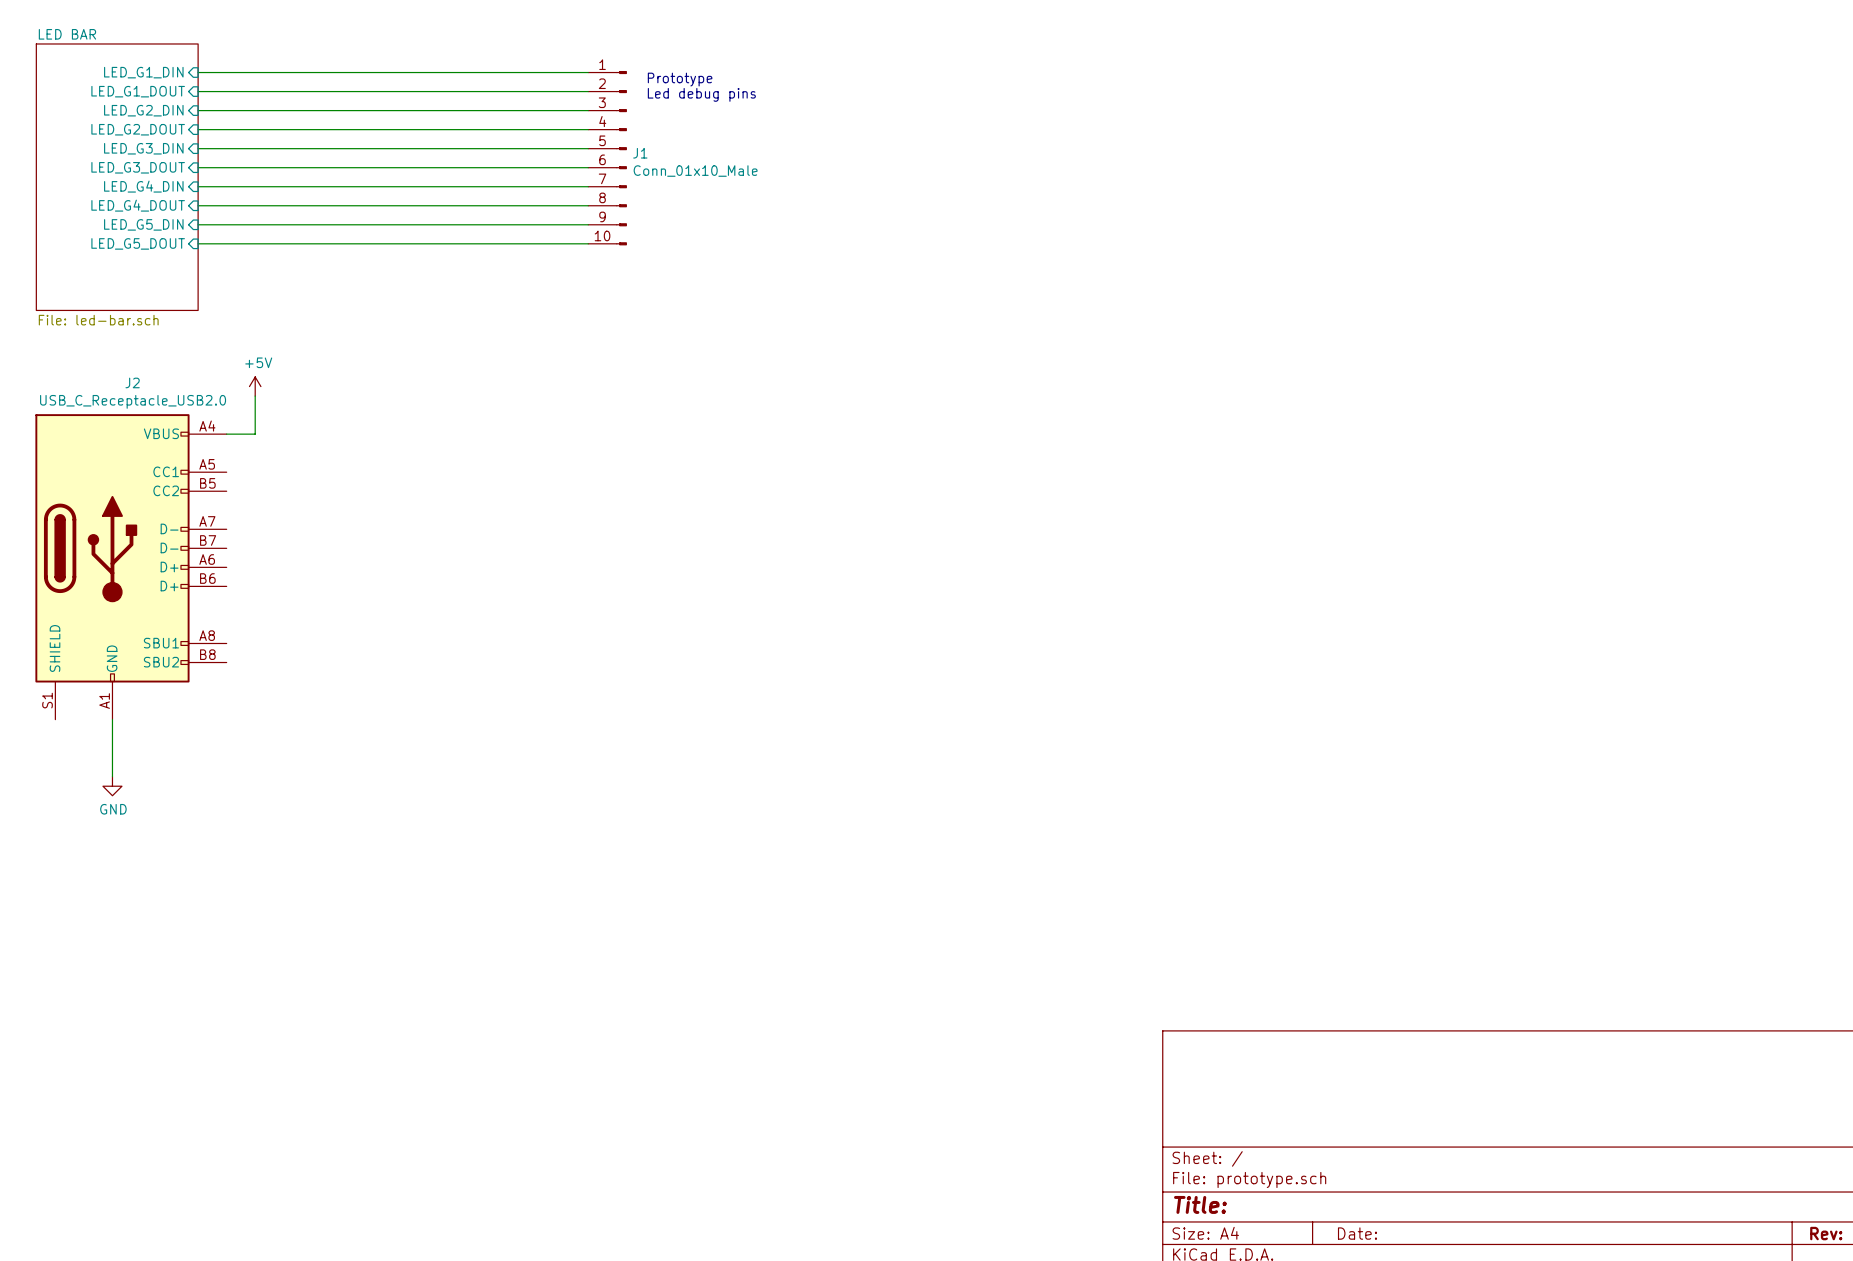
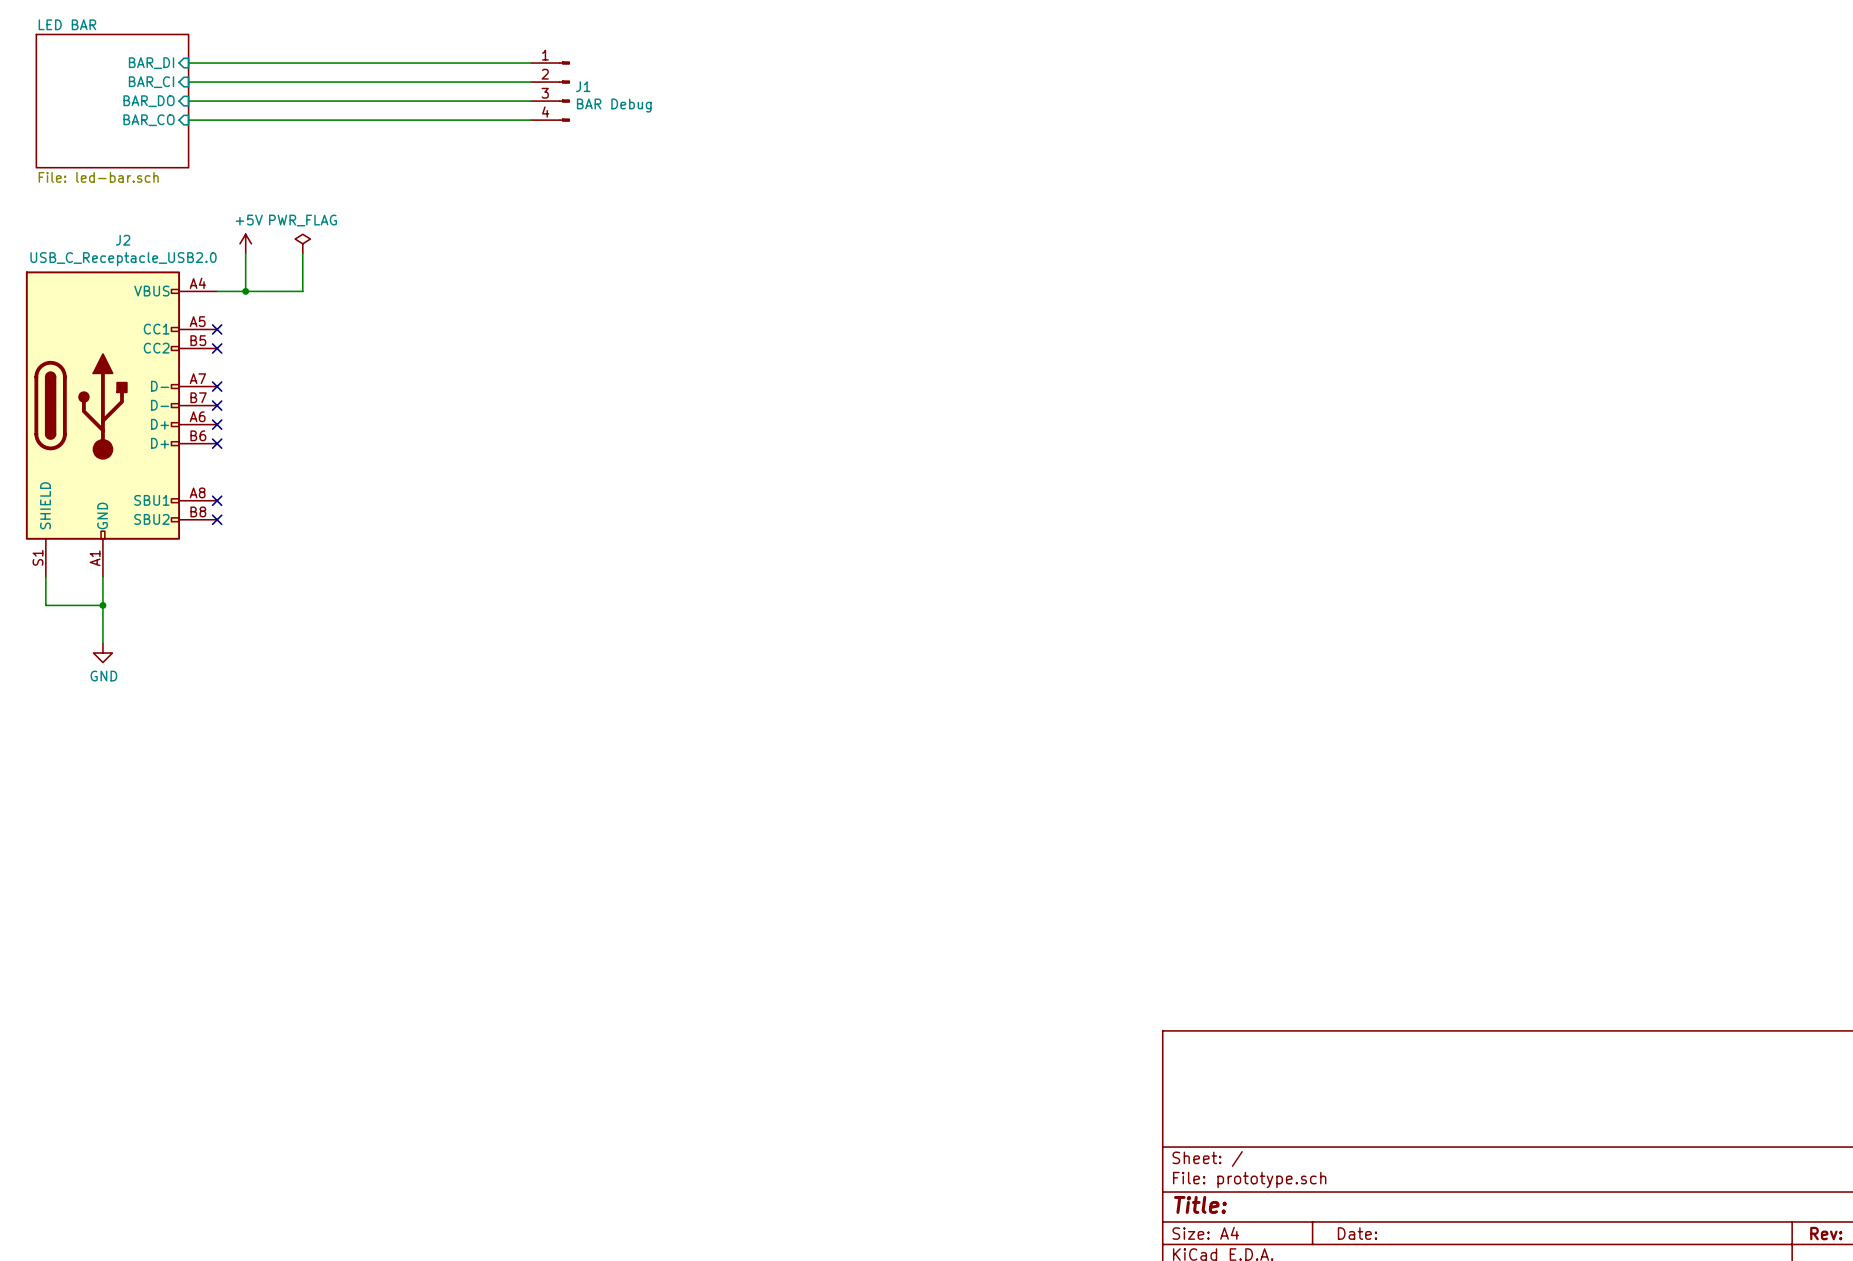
sheet pin: none -> BAR_DI (151, 63)
wire: none -> (188, 63) (531, 63)
J1 symbol: [588, 71, 627, 246] -> [531, 61, 570, 122]
sheet pin: LED_G1_DIN (143, 72) -> none
wire: (198, 72) (588, 72) -> none
text: Prototype (680, 79) -> none
sheet pin: none -> BAR_CI (151, 82)
wire: none -> (188, 82) (531, 82)
sheet pin: LED_G1_DOUT (138, 91) -> none
wire: (198, 91) (588, 91) -> none
text: Led debug pins (701, 94) -> none
sheet LED BAR: none -> File: led-bar.sch (112, 101)
sheet pin: none -> BAR_DO (149, 101)
wire: none -> (188, 101) (531, 101)
sheet pin: LED_G2_DIN (143, 110) -> none
wire: (198, 110) (588, 110) -> none
sheet pin: none -> BAR_CO (149, 120)
wire: none -> (188, 120) (531, 120)
sheet pin: LED_G2_DOUT (138, 129) -> none
wire: (198, 129) (588, 129) -> none
sheet pin: LED_G3_DIN (143, 148) -> none
wire: (198, 148) (588, 148) -> none
sheet pin: LED_G3_DOUT (138, 167) -> none
wire: (198, 167) (588, 167) -> none
J1 value: Conn_01x10_Male (695, 171) -> BAR Debug (614, 105)
sheet LED BAR: File: led-bar.sch (117, 177) -> none
sheet pin: LED_G4_DIN (143, 186) -> none
wire: (198, 186) (588, 186) -> none
sheet pin: LED_G4_DOUT (138, 205) -> none
wire: (198, 205) (588, 205) -> none
sheet pin: LED_G5_DIN (143, 224) -> none
wire: (198, 224) (588, 224) -> none
sheet pin: LED_G5_DOUT (138, 243) -> none
wire: (198, 243) (588, 243) -> none
power symbol: none -> PWR_FLAG (302, 243)
wire: none -> (245, 253) (245, 291)
wire: none -> (302, 253) (302, 291) (217, 291)
junction: none -> (245, 291)
no-connect mark: none -> (217, 329)
no-connect mark: none -> (217, 348)
no-connect mark: none -> (217, 386)
power symbol position: +5V (255, 386) -> +5V (245, 243)
wire: (255, 396) (255, 434) (226, 434) -> none
no-connect mark: none -> (217, 405)
no-connect mark: none -> (217, 424)
no-connect mark: none -> (217, 443)
no-connect mark: none -> (217, 500)
no-connect mark: none -> (217, 519)
J2 position: (131, 566) -> (121, 424)
junction: none -> (102, 605)
wire: (112, 719) (112, 776) -> none
power symbol position: GND (112, 786) -> GND (102, 653)

